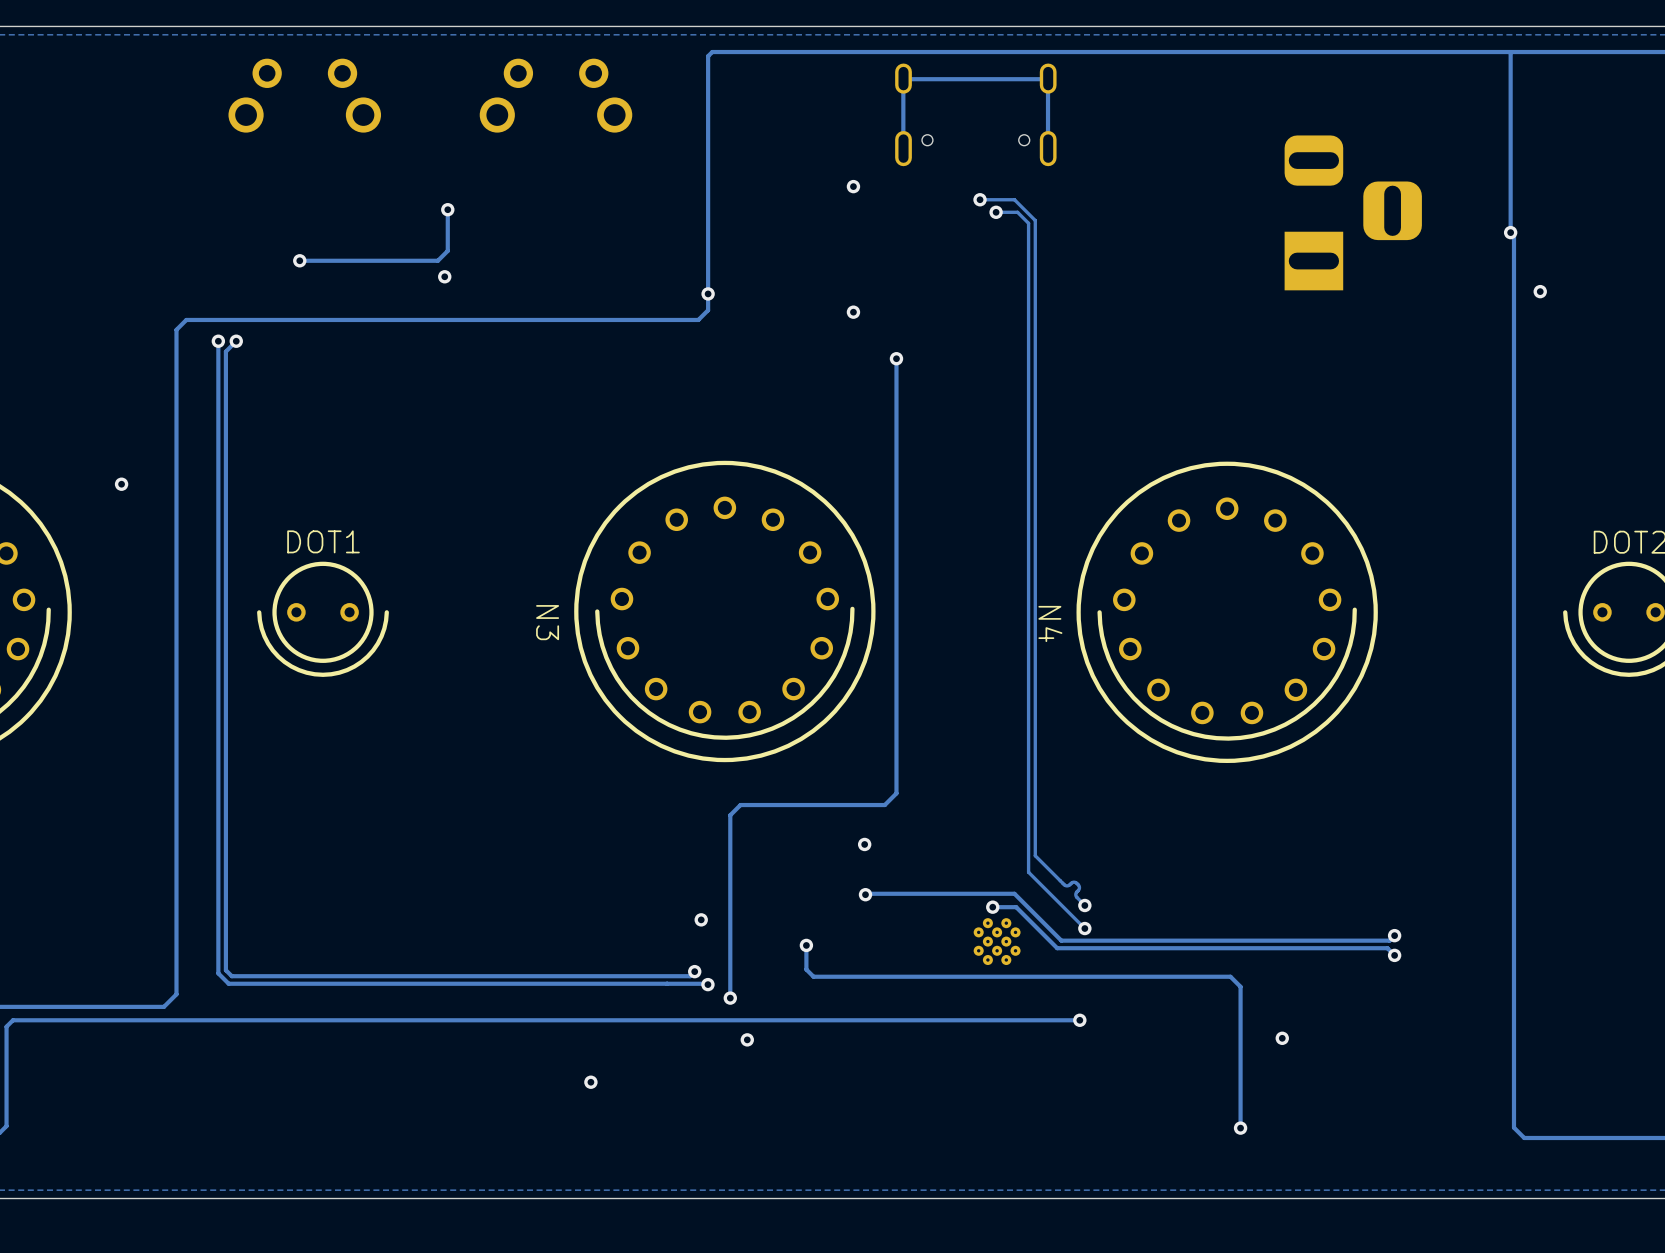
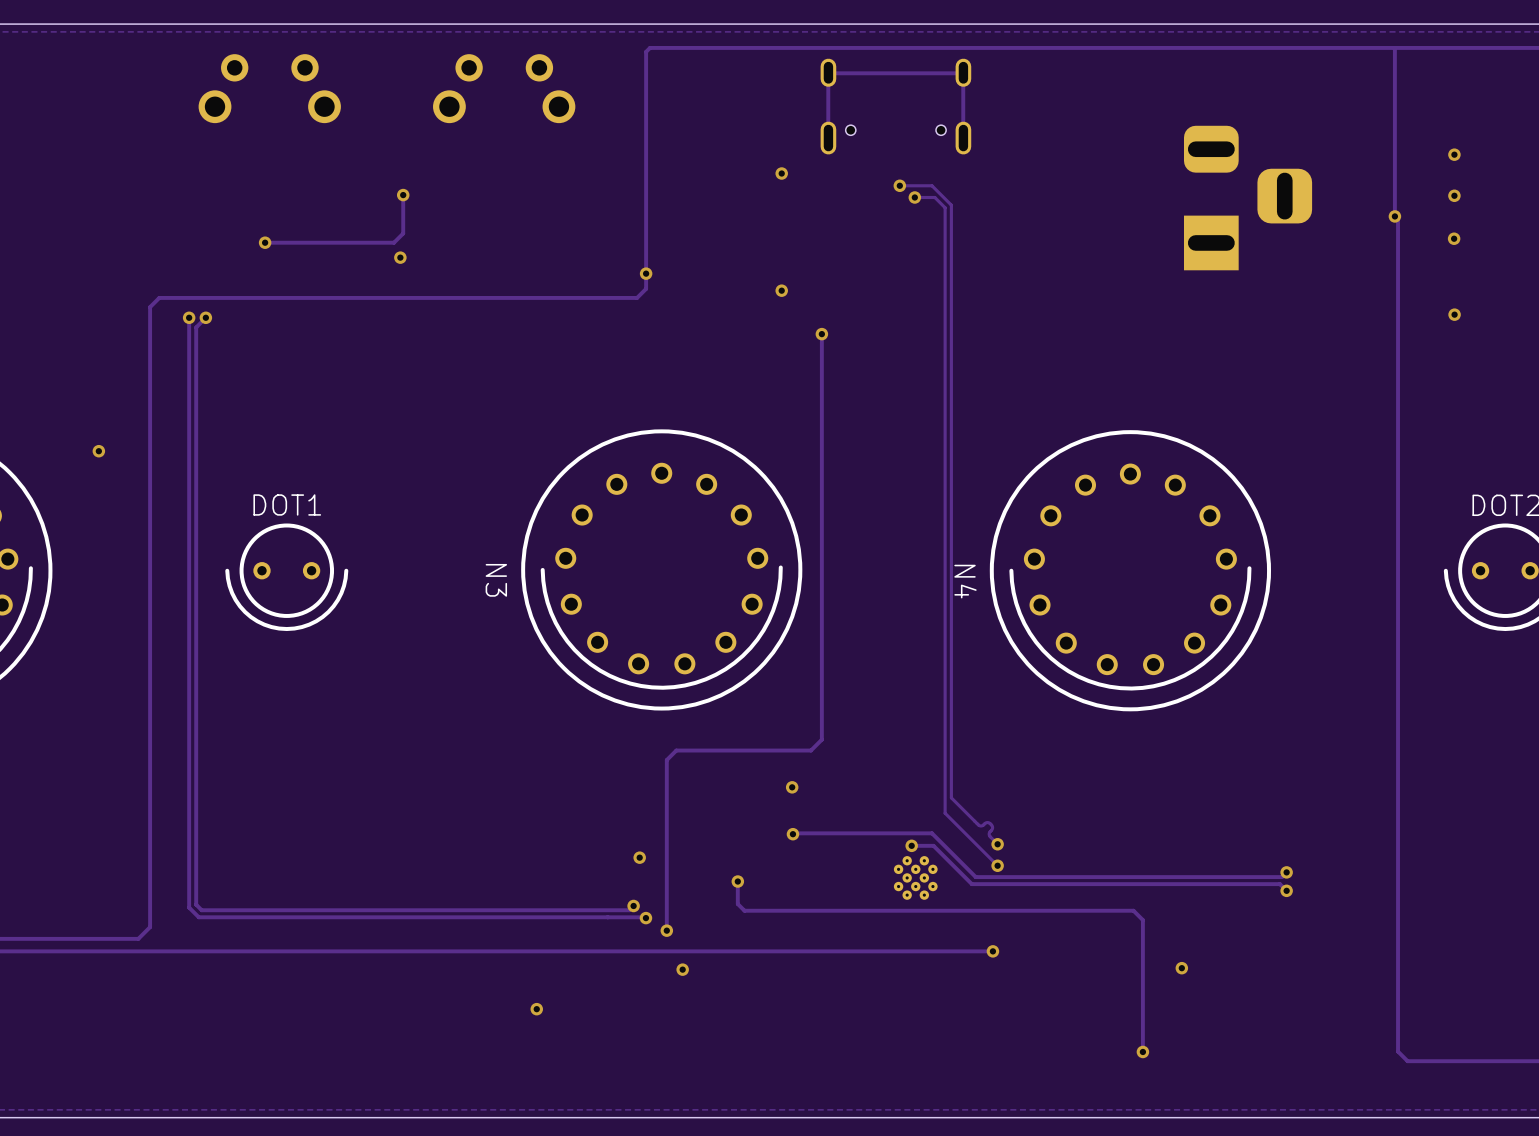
via: none -> (1454, 154)
via: none -> (1454, 195)
via: none -> (1454, 238)
via: (1540, 291) -> none
via: none -> (1454, 314)

